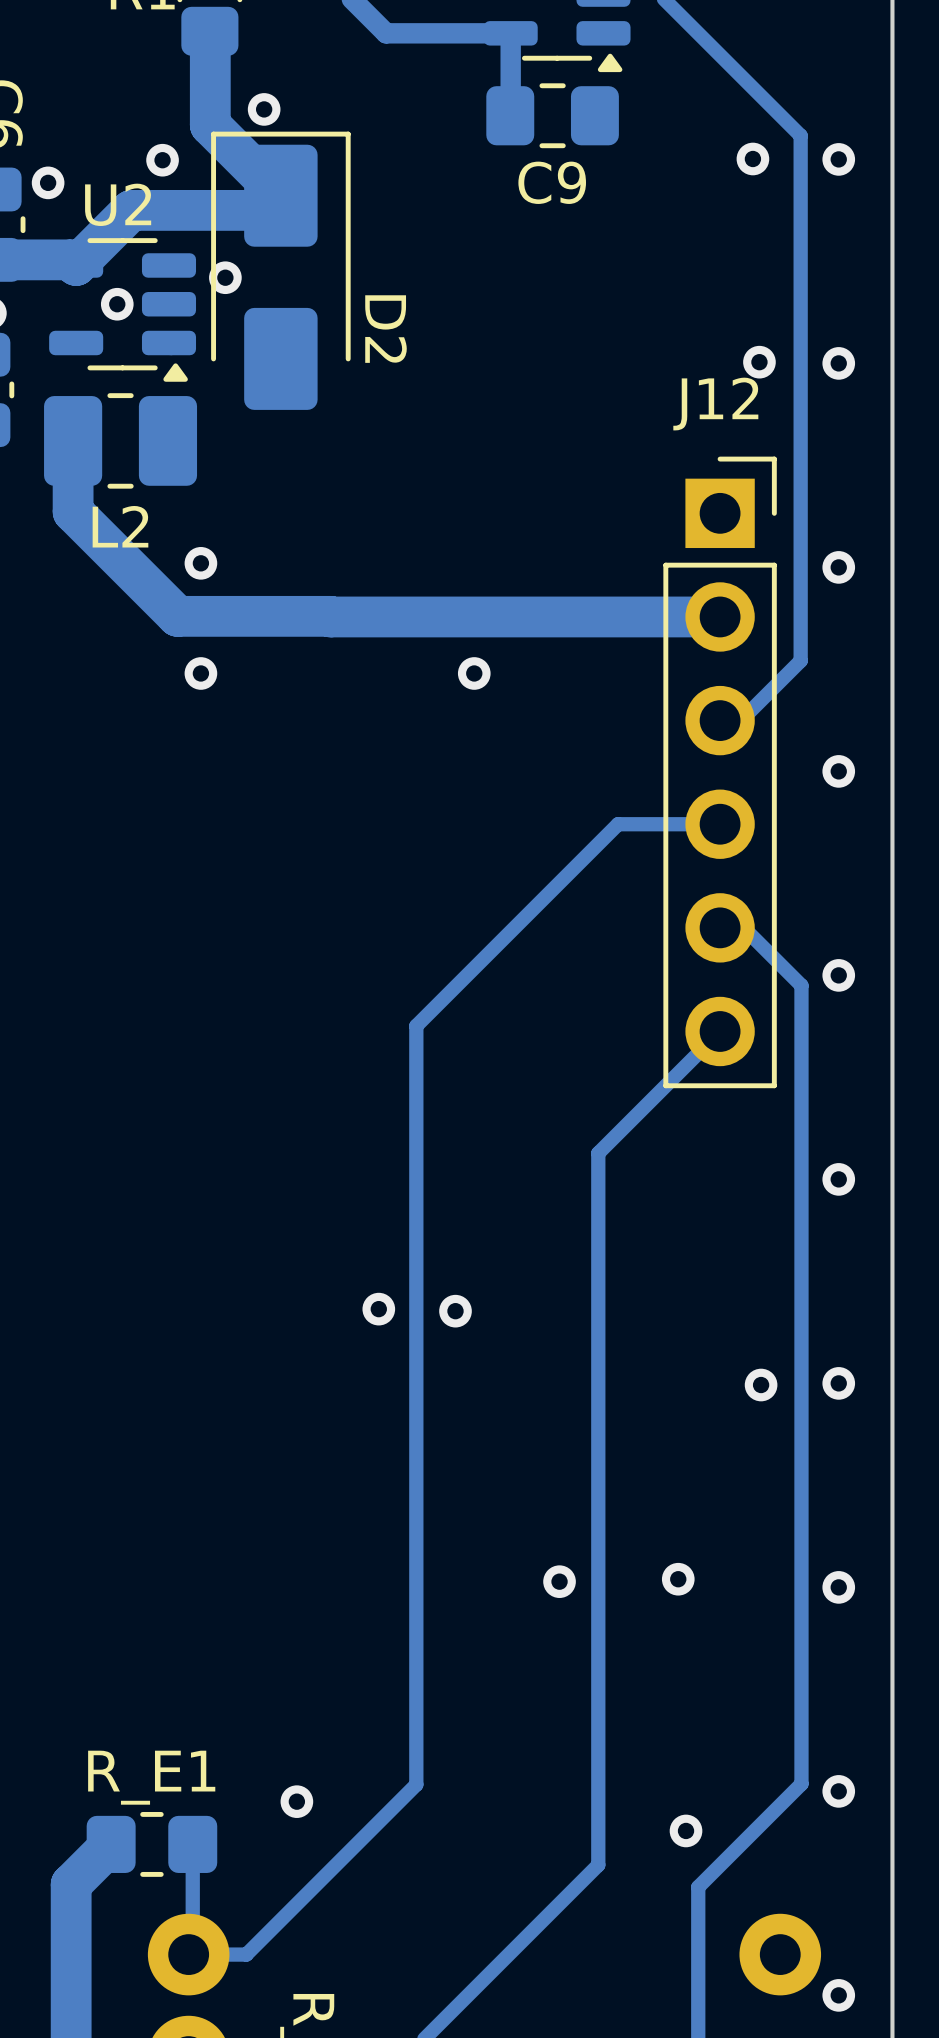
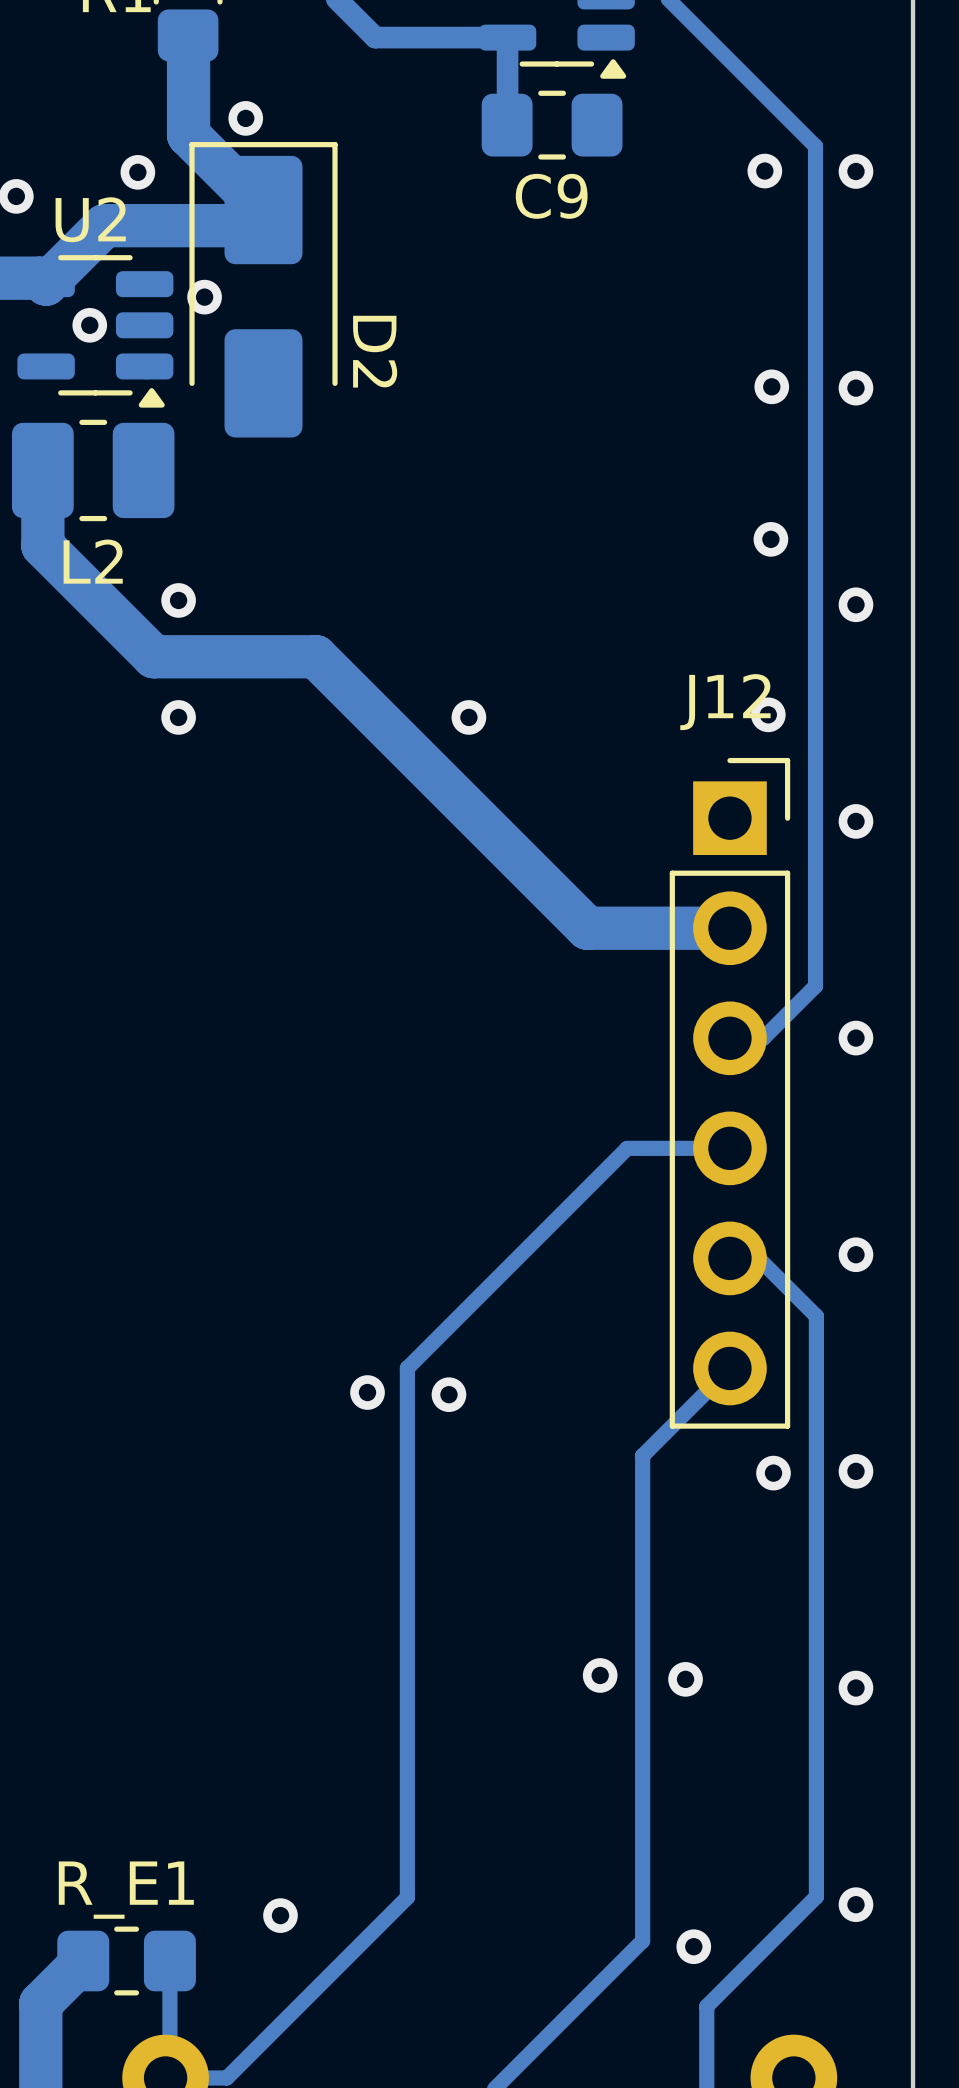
via: none -> (770, 539)
bottom track: (720, 616) (330, 616) -> (729, 928) (587, 928) (316, 657)
bottom track: (800, 660) (740, 720) (720, 720) -> (815, 704) (815, 986) (763, 1038) (729, 1038)
via: none -> (768, 714)
J12 position: (720, 772) -> (729, 1093)
bottom track: (720, 824) (618, 824) (416, 1025) (416, 1286) -> (729, 1148) (627, 1148) (407, 1368)
bottom track: (720, 927) (743, 927) (801, 985) (801, 1237) -> (729, 1258) (758, 1258) (816, 1316)
bottom track: (720, 1031) (598, 1153) (598, 1865) -> (729, 1368) (642, 1455) (642, 1940) (600, 1982)
via position: (559, 1581) -> (600, 1675)

